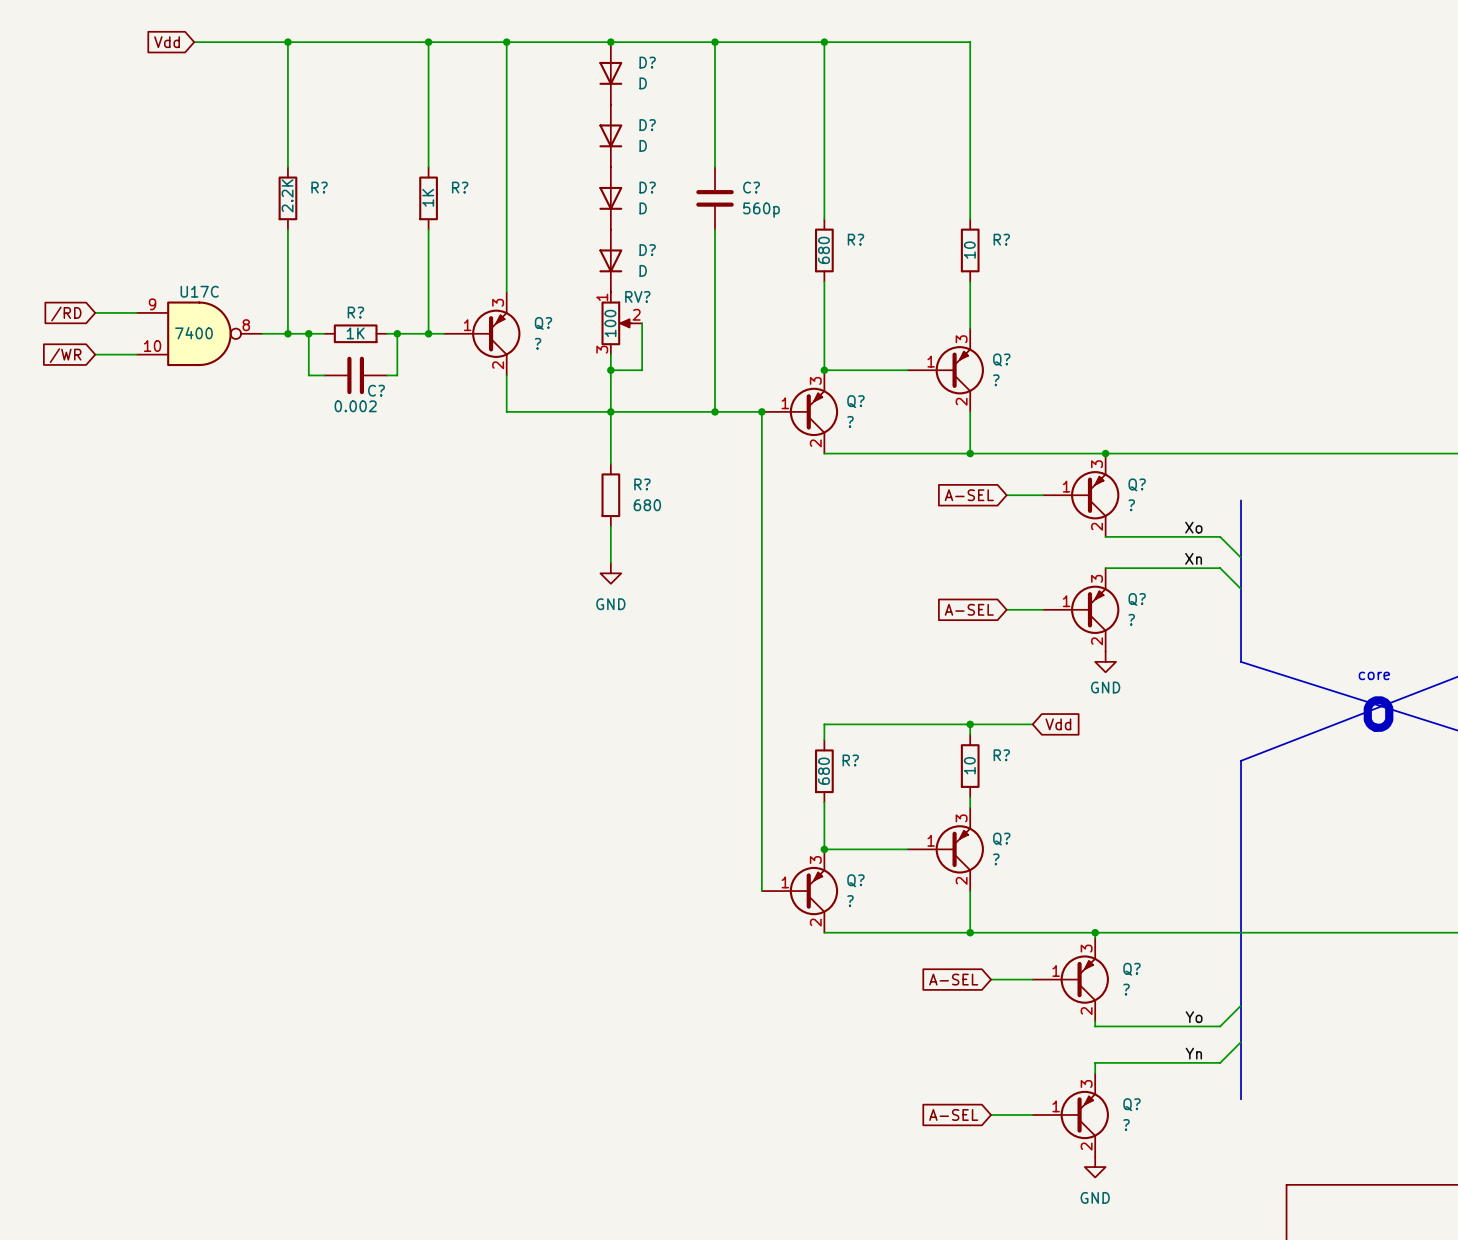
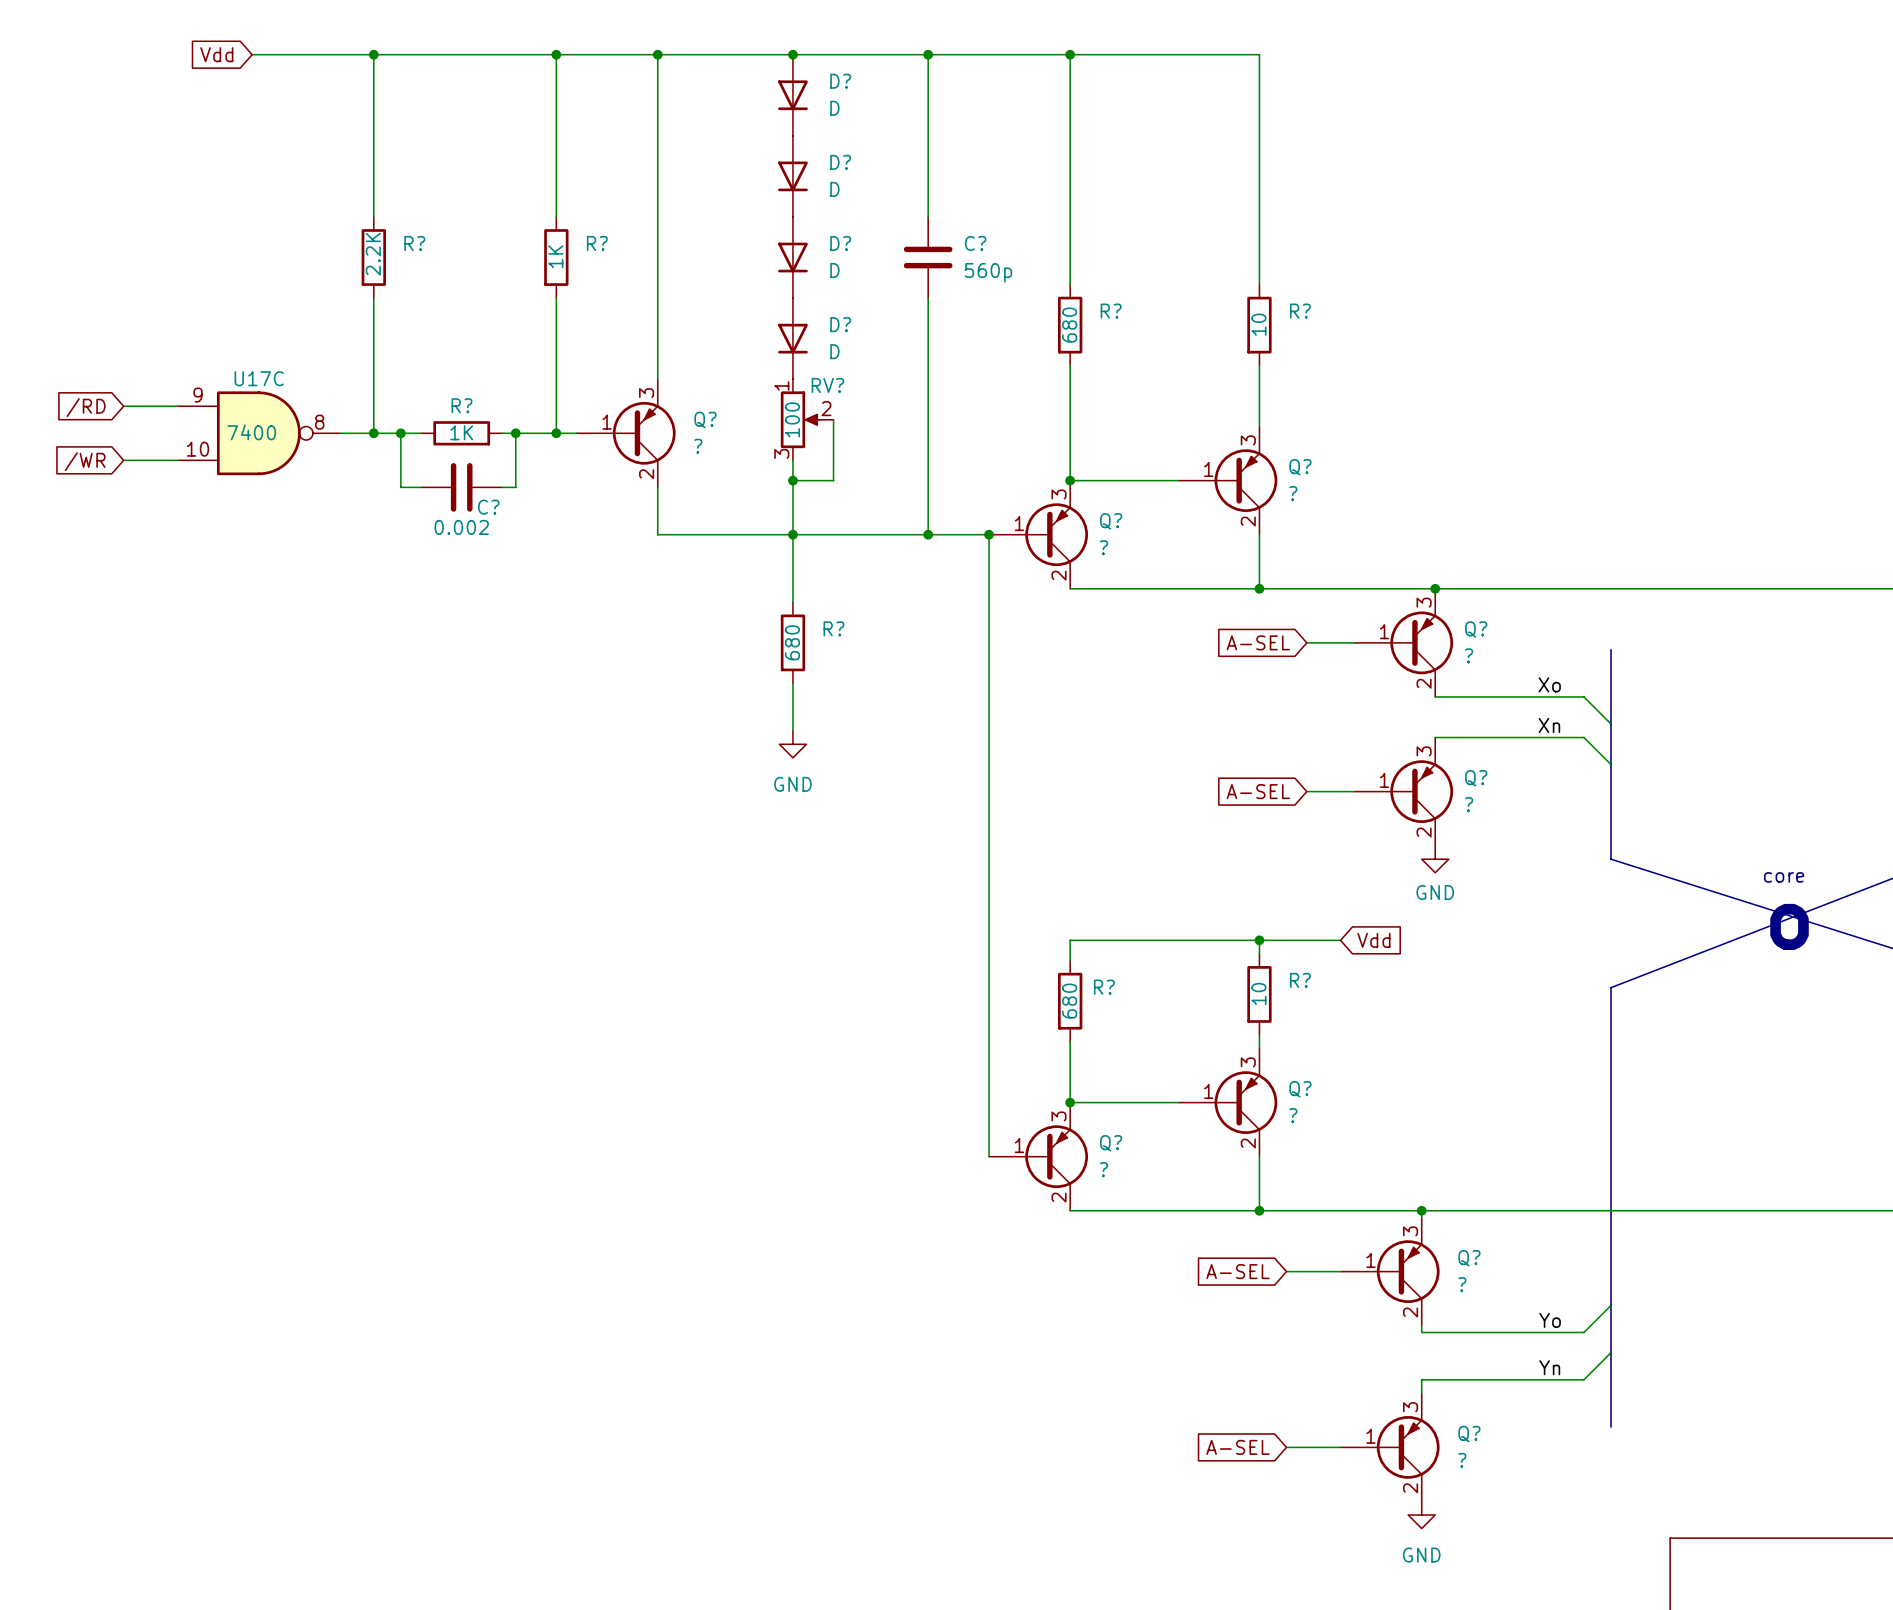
R? value rotation: 0° (647, 505) -> 90° counterclockwise (792, 642)
R? value position: 680 (647, 505) -> 680 (792, 642)

